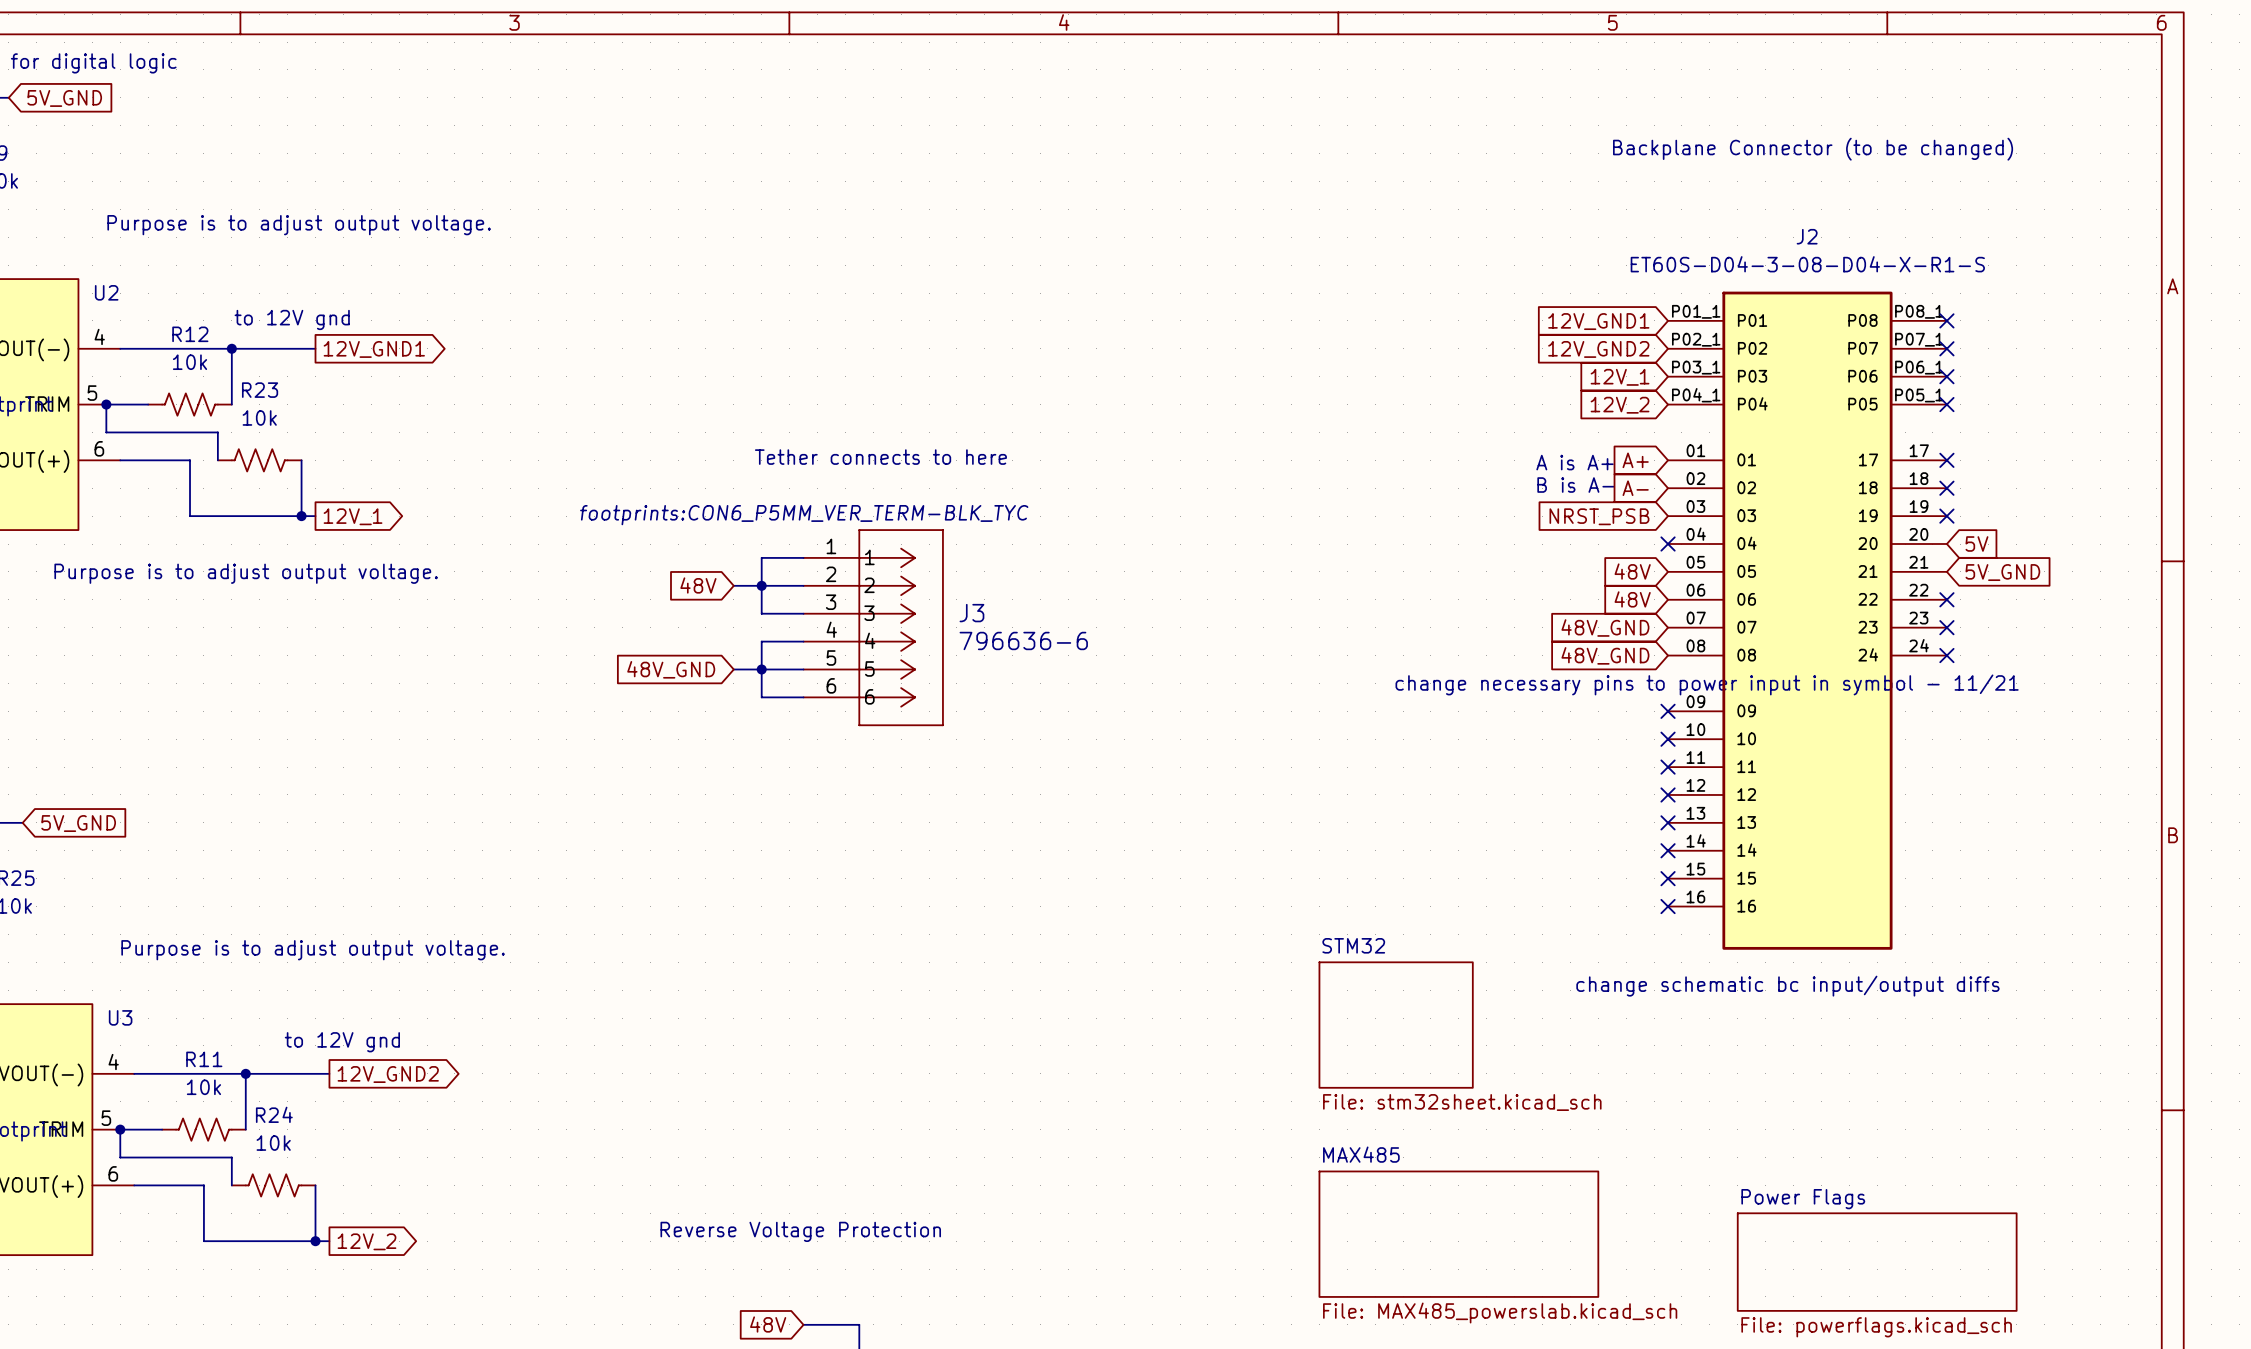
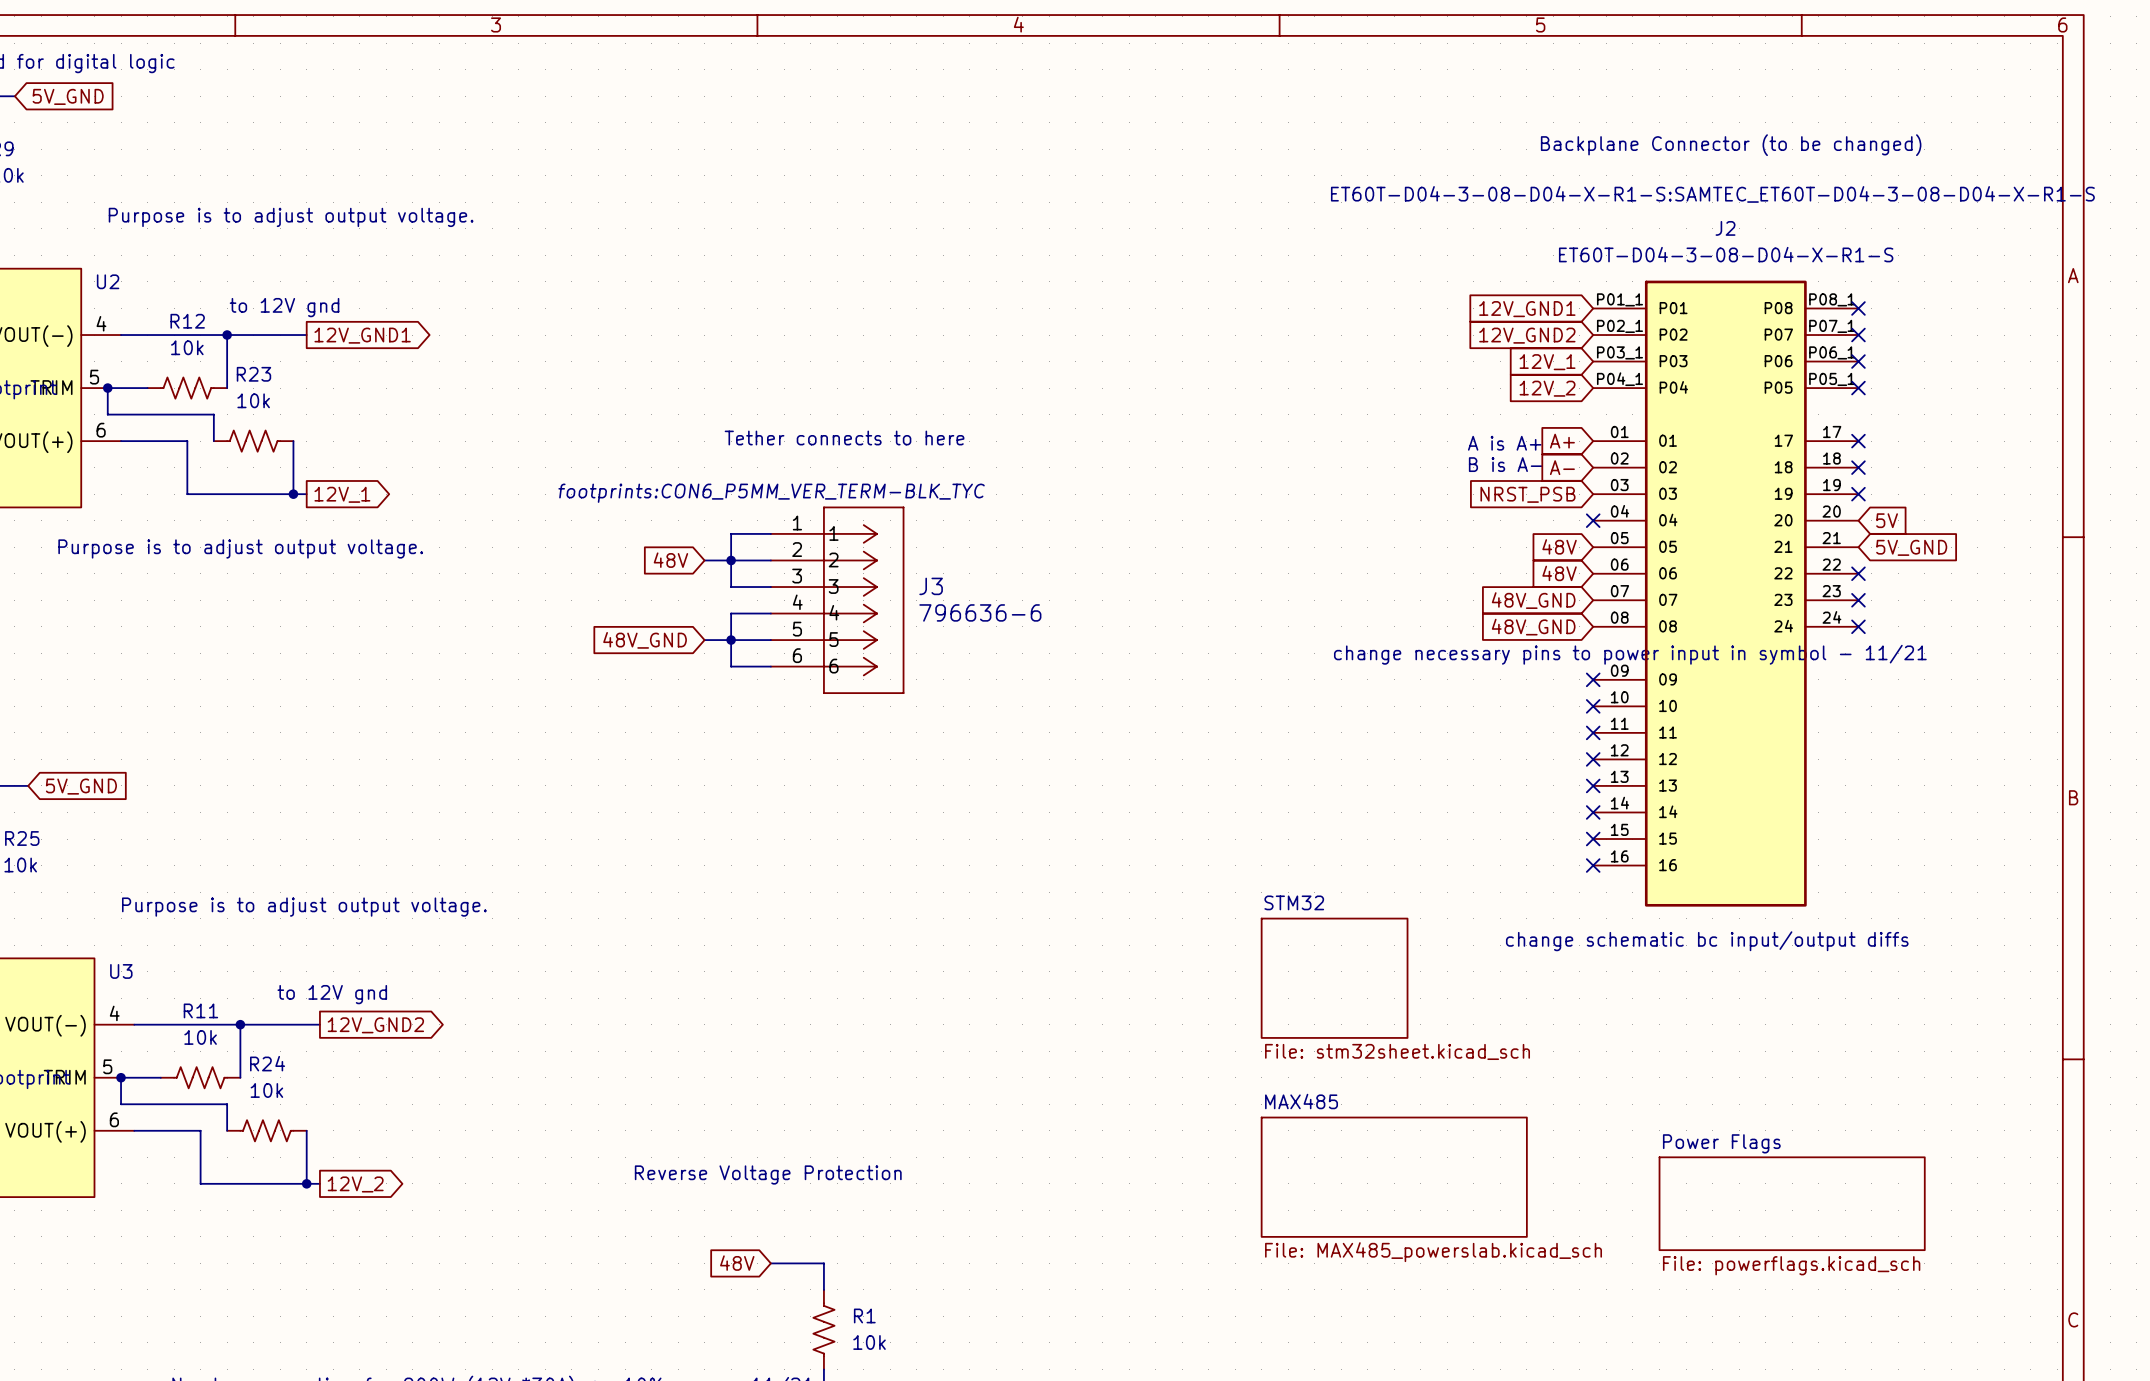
J2 text: none -> ET60T-D04-3-08-D04-X-R1-S:SAMTEC_ET60T-D04-3-08-D04-X-R1-S (1712, 194)
J2 value: ET60S-D04-3-08-D04-X-R1-S (1807, 264) -> ET60T-D04-3-08-D04-X-R1-S (1726, 254)

